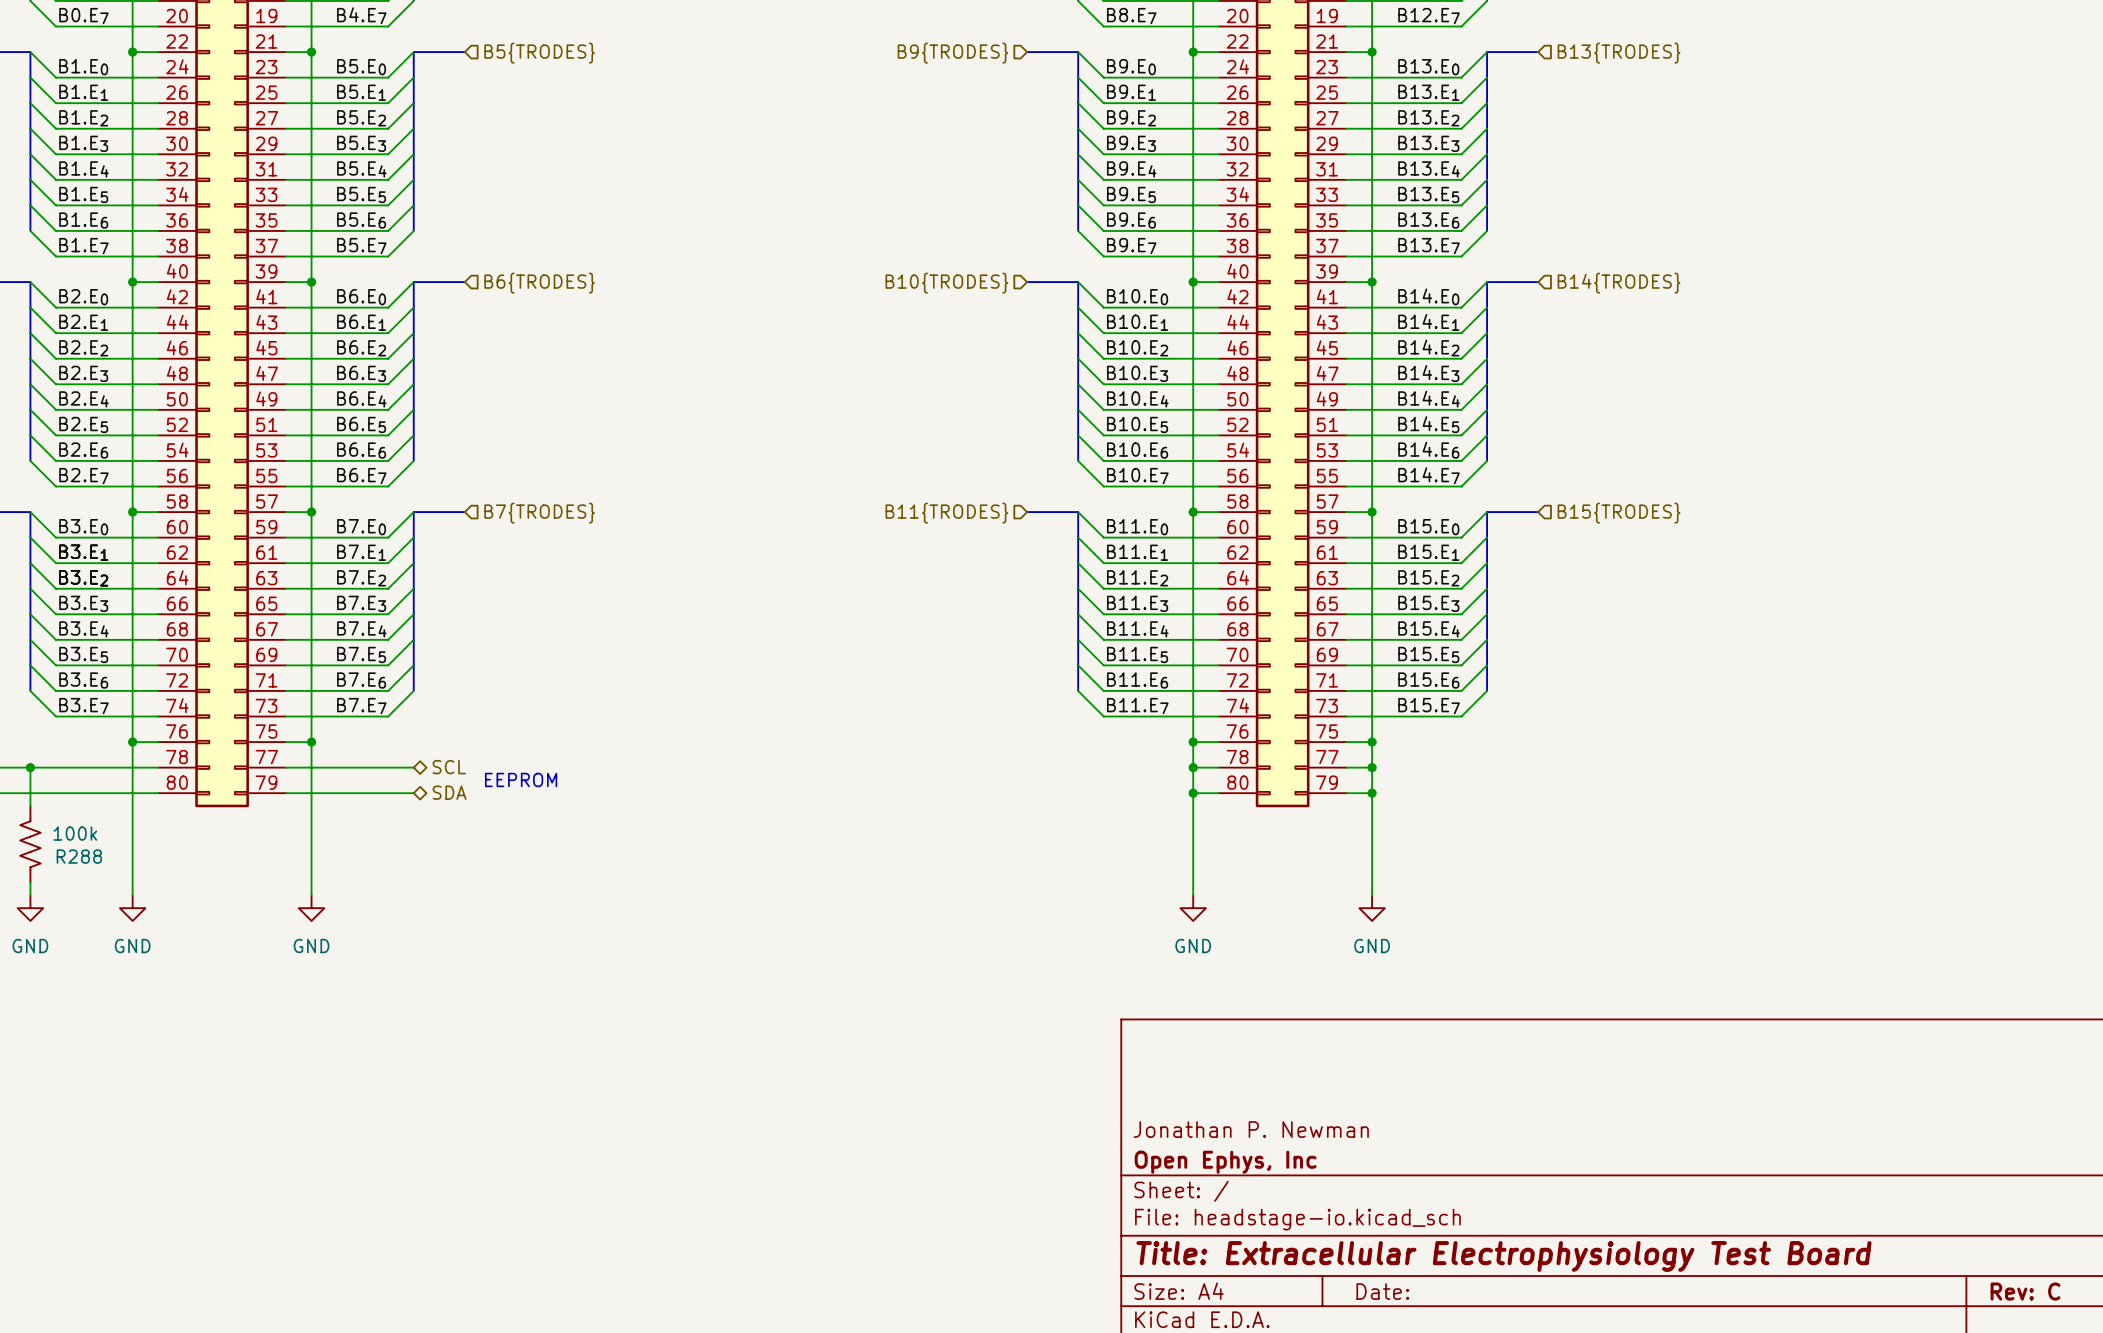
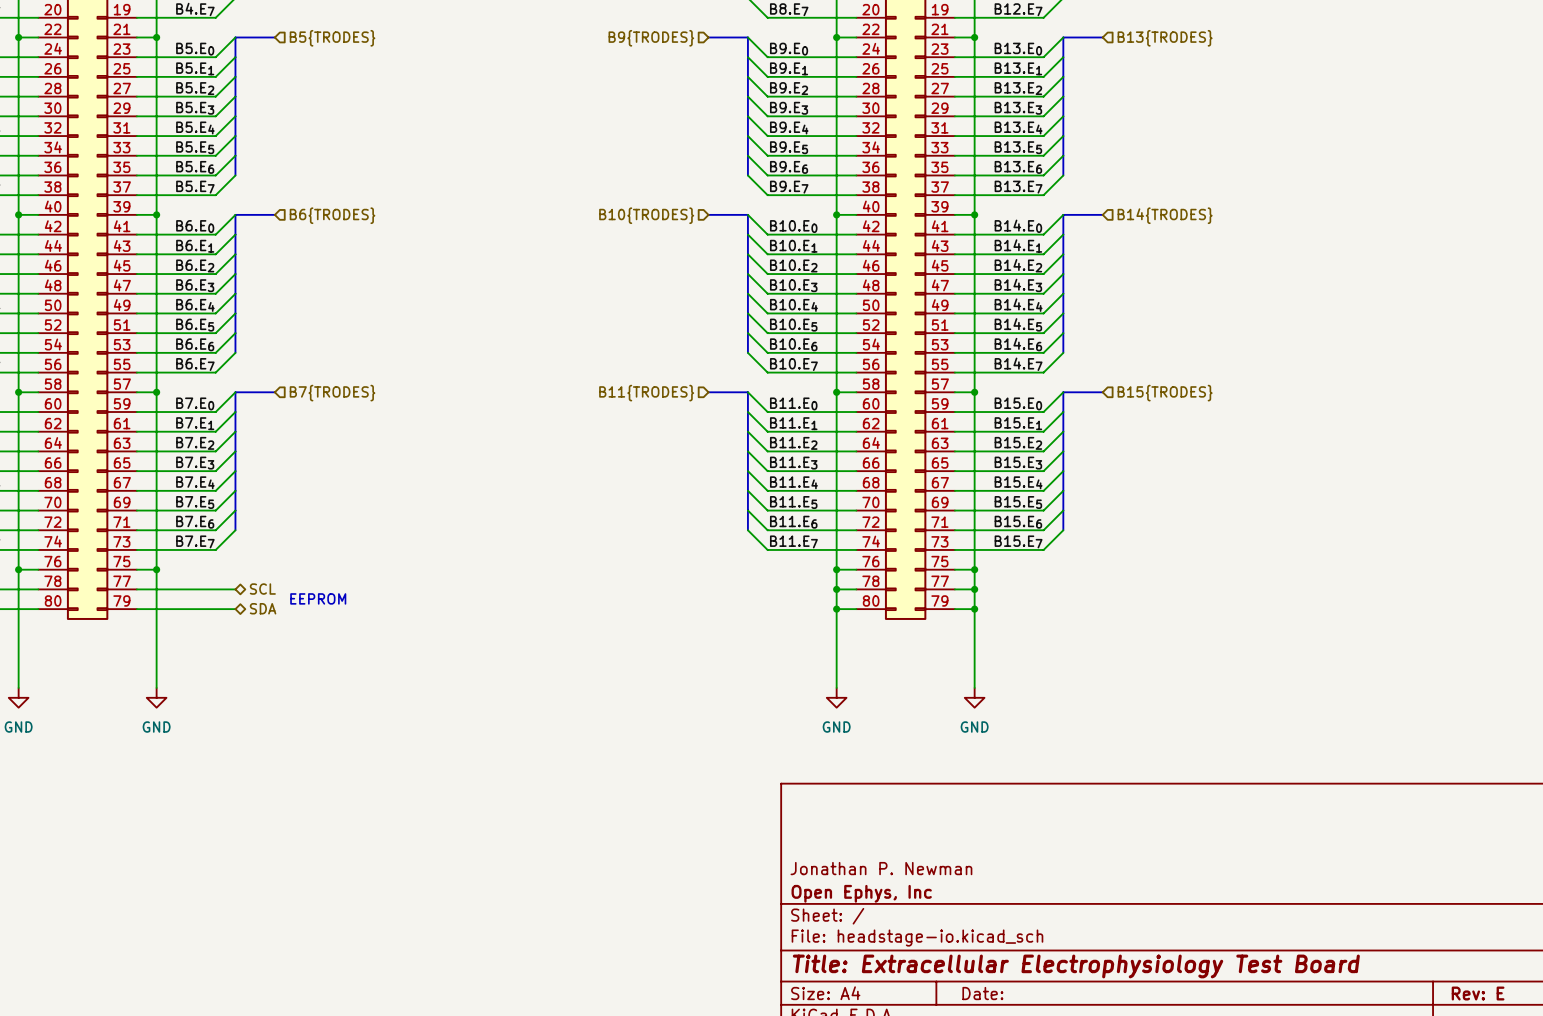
title block: Rev: C (2025, 1291) -> Rev: E (1478, 993)

